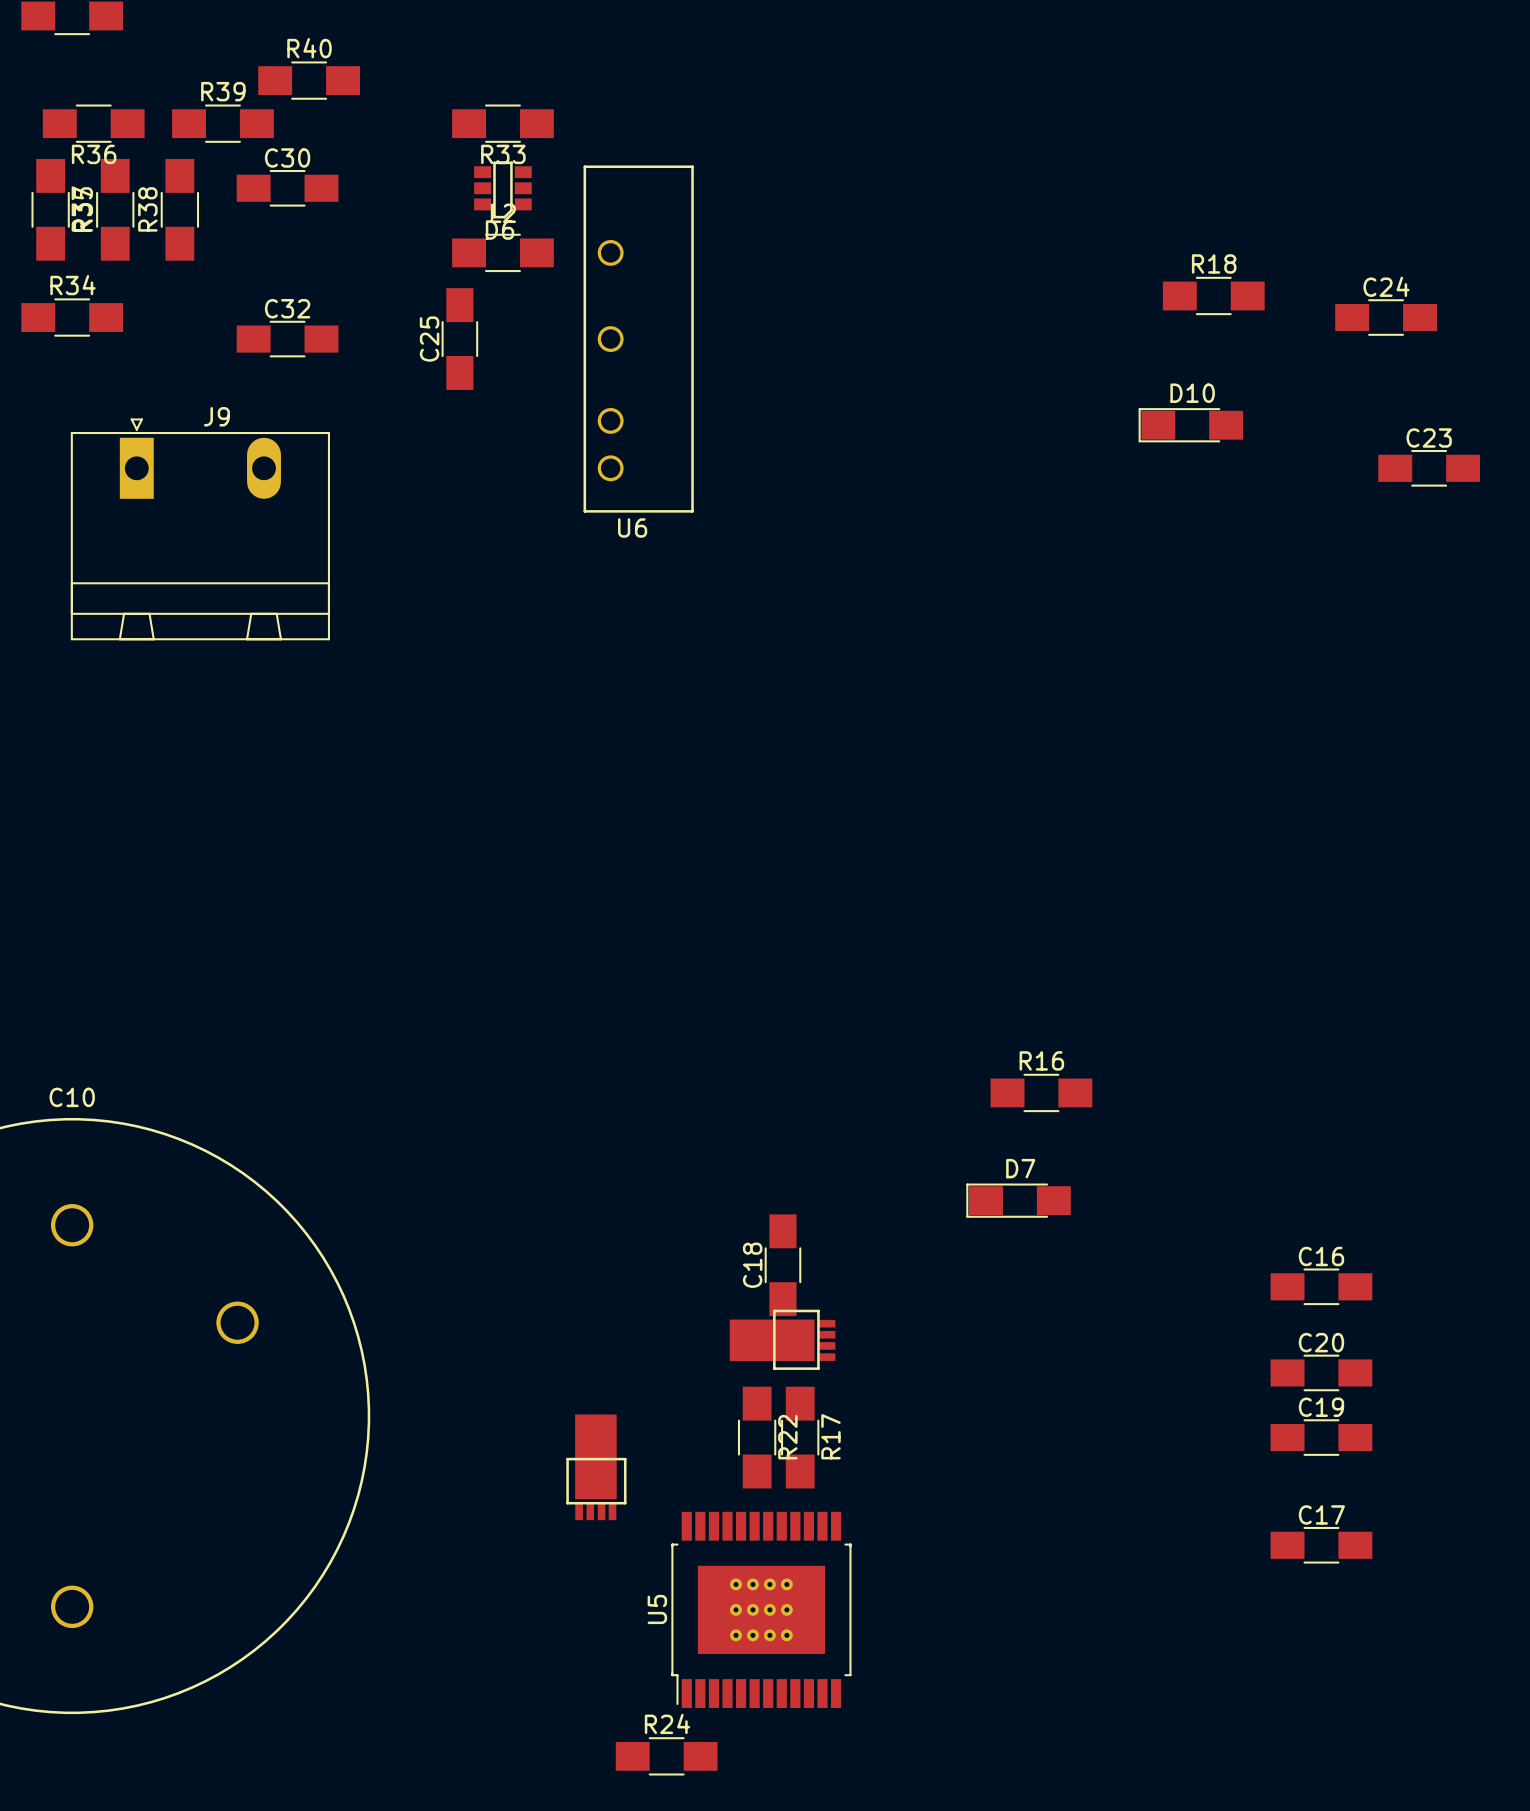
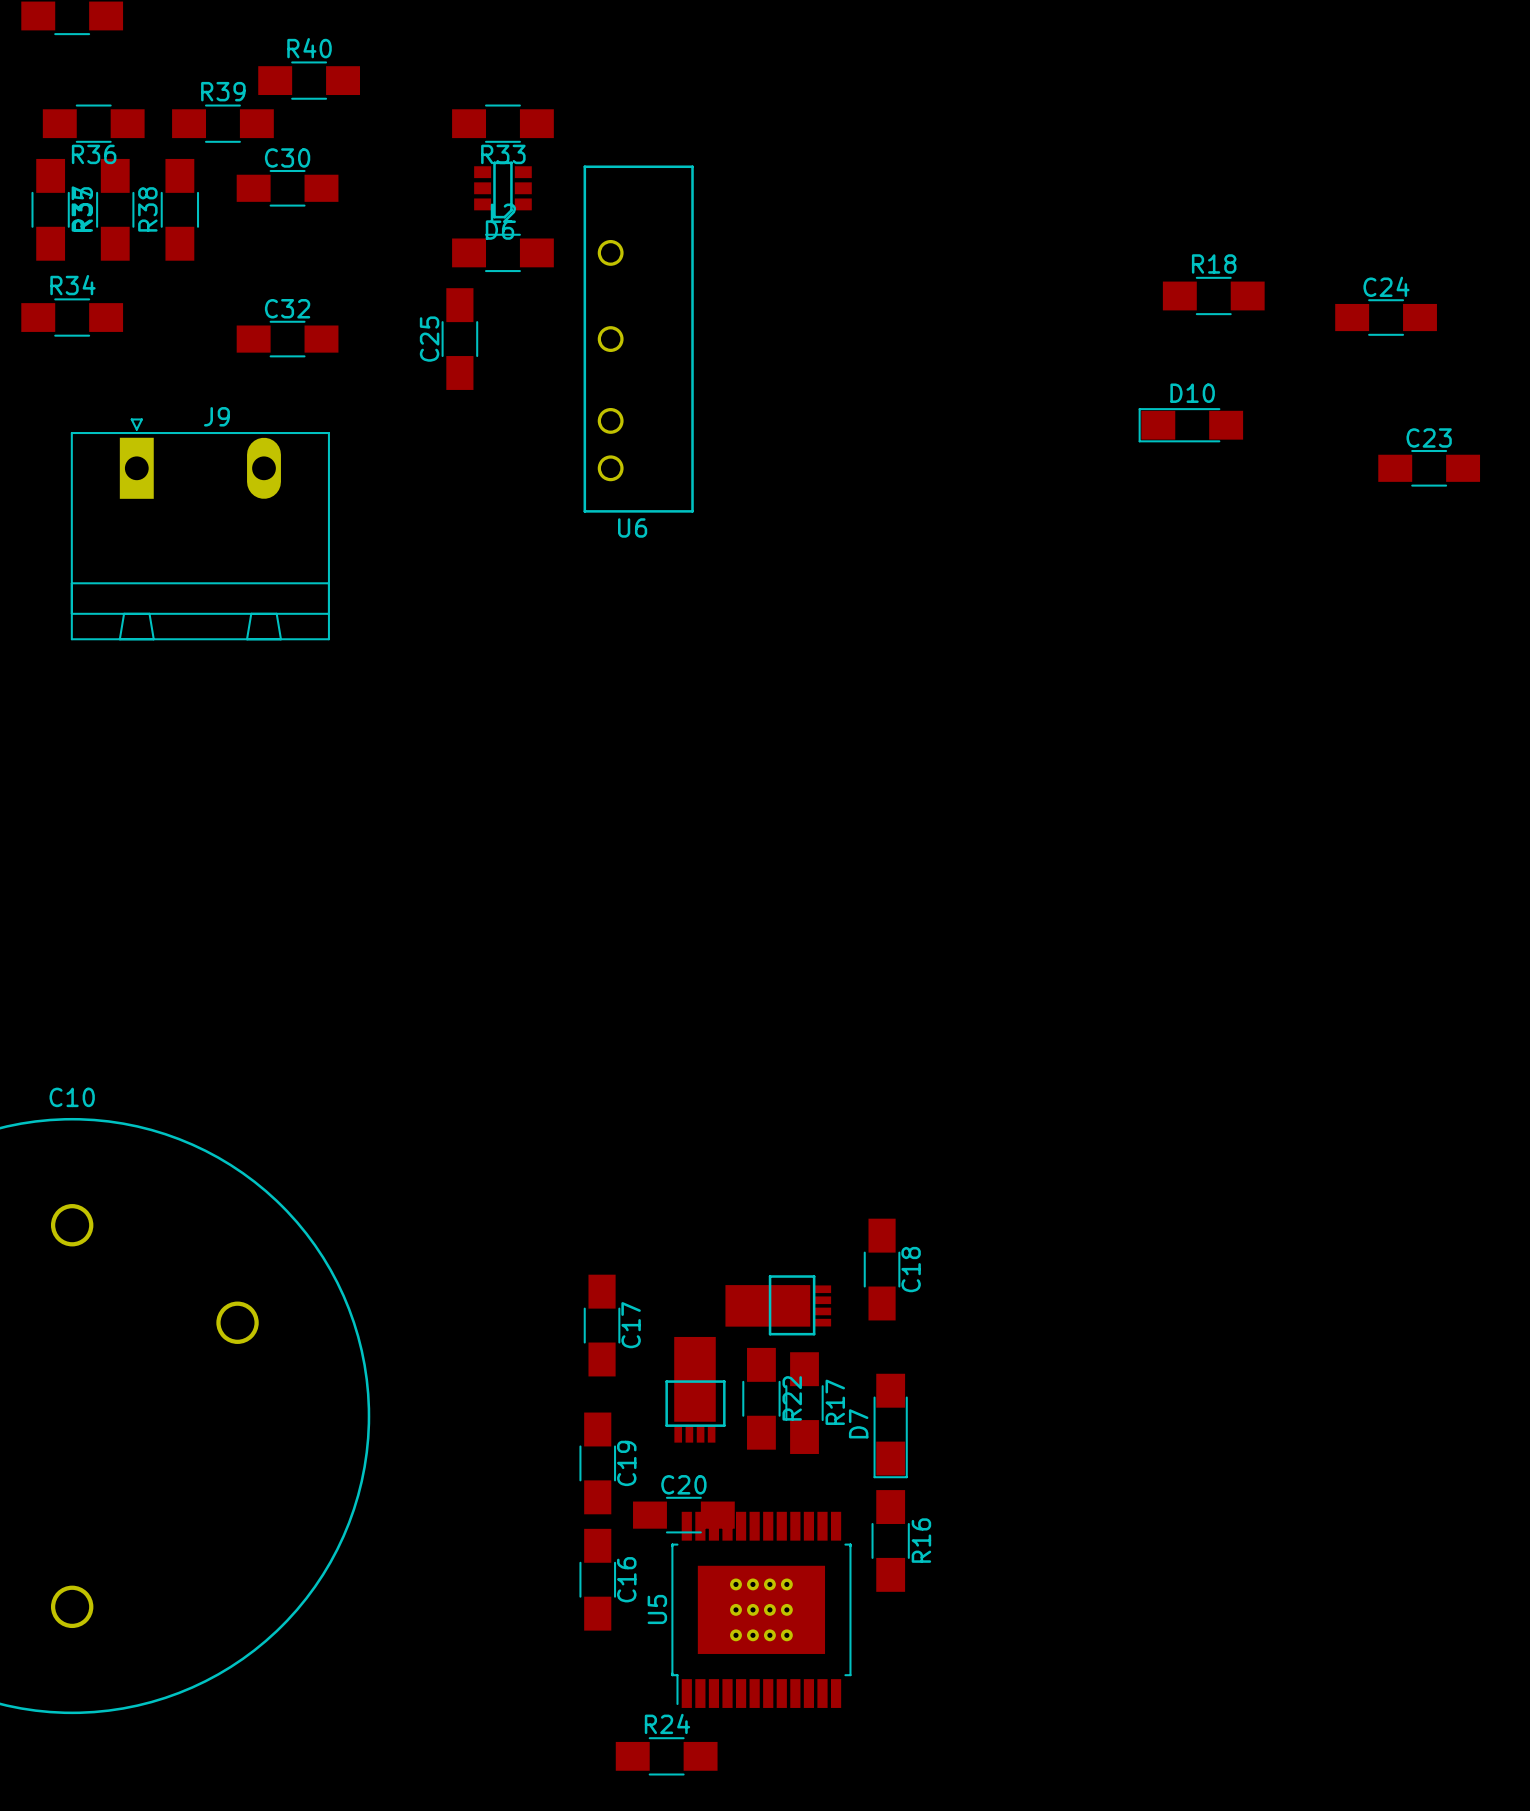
R16 rotation: 0° (1041, 1092) -> 90° clockwise (890, 1540)
R16 position: (1041, 1092) -> (890, 1540)
D7 rotation: 0° (1018, 1200) -> 90° counterclockwise (890, 1426)
D7 position: (1018, 1200) -> (890, 1426)
C18 name position: C18 (752, 1265) -> C18 (911, 1269)
C18 position: (782, 1265) -> (882, 1269)
C16 rotation: 0° (1321, 1286) -> 90° clockwise (597, 1579)
C16 position: (1321, 1286) -> (597, 1579)
part position: (782, 1339) -> (778, 1305)
C20 position: (1321, 1372) -> (683, 1515)
part: none -> (695, 1389)
R22 position: (757, 1437) -> (761, 1398)
R17 position: (800, 1437) -> (804, 1403)
C19 rotation: 0° (1321, 1437) -> 90° clockwise (597, 1463)
C19 position: (1321, 1437) -> (597, 1463)
part: (596, 1467) -> none
C17 rotation: 0° (1321, 1545) -> 90° clockwise (602, 1325)
C17 position: (1321, 1545) -> (602, 1325)

